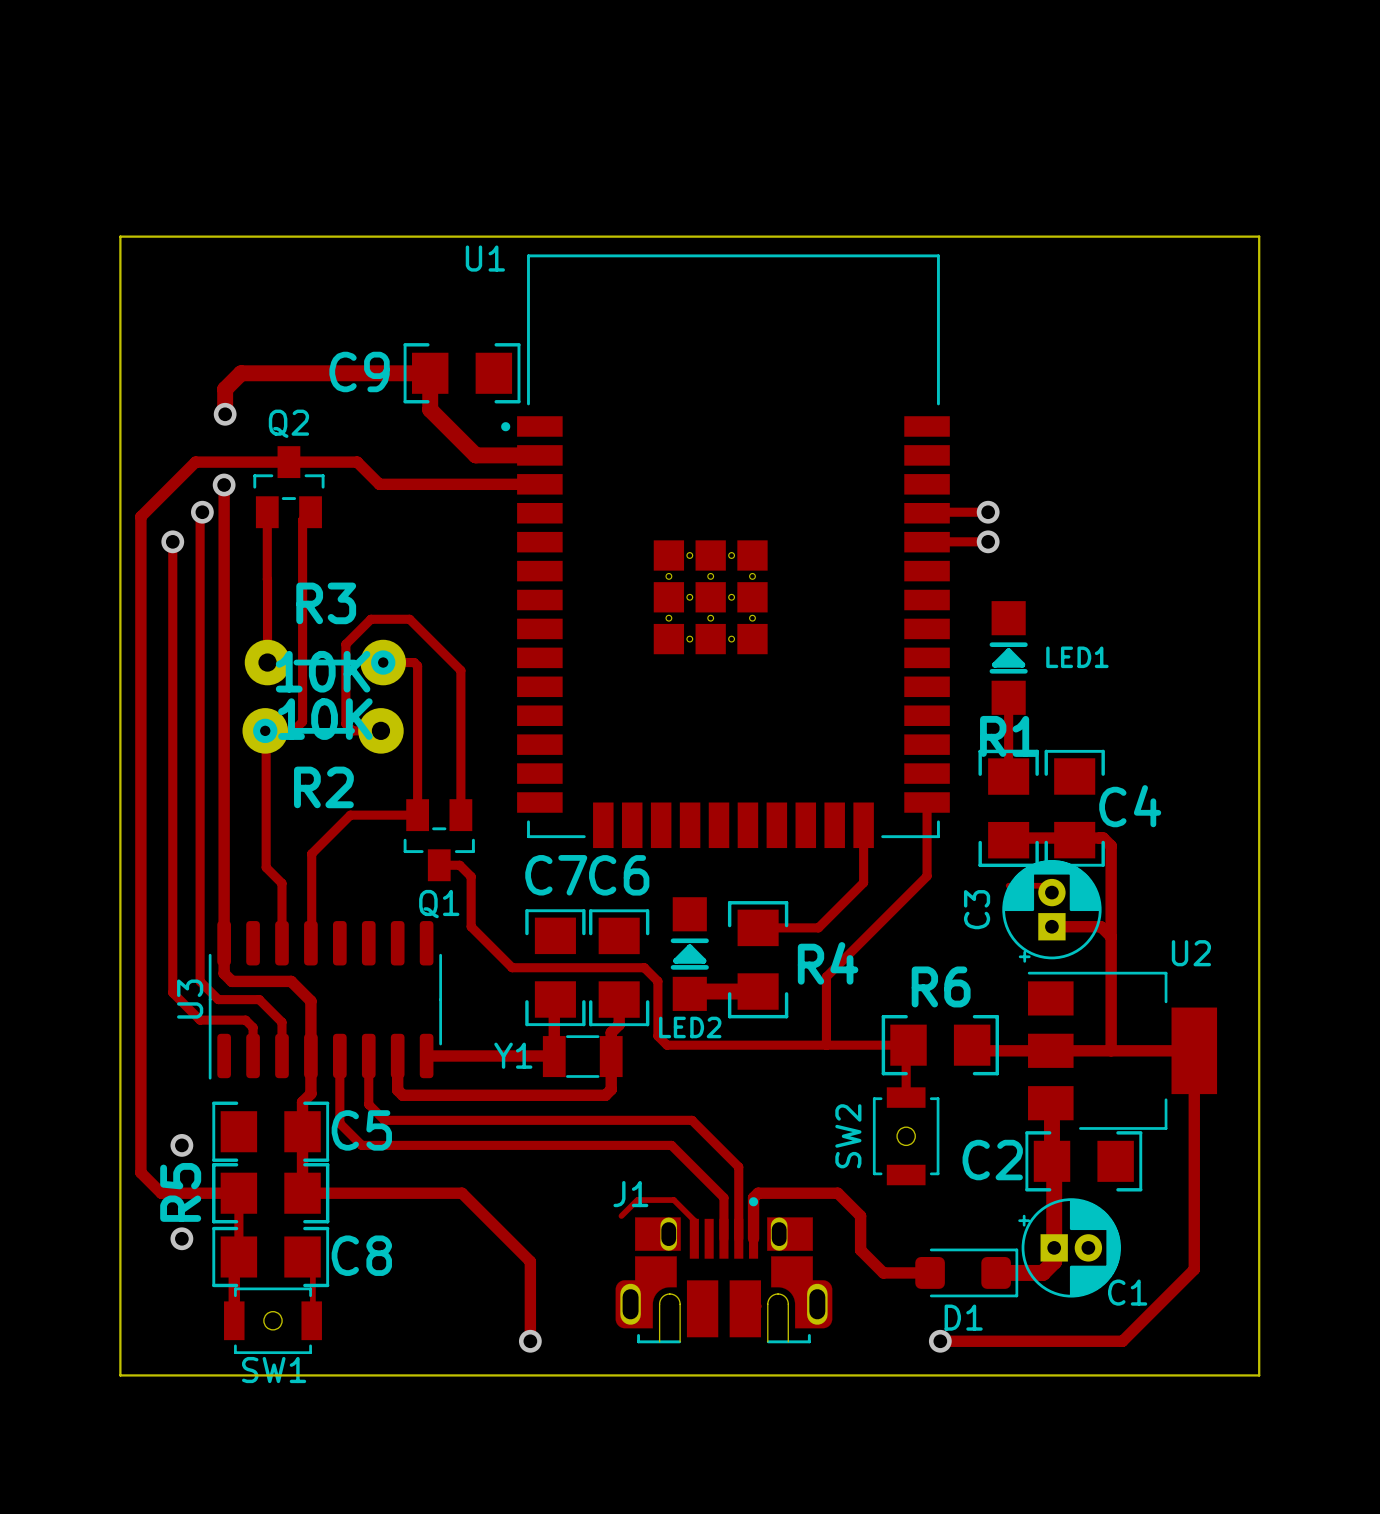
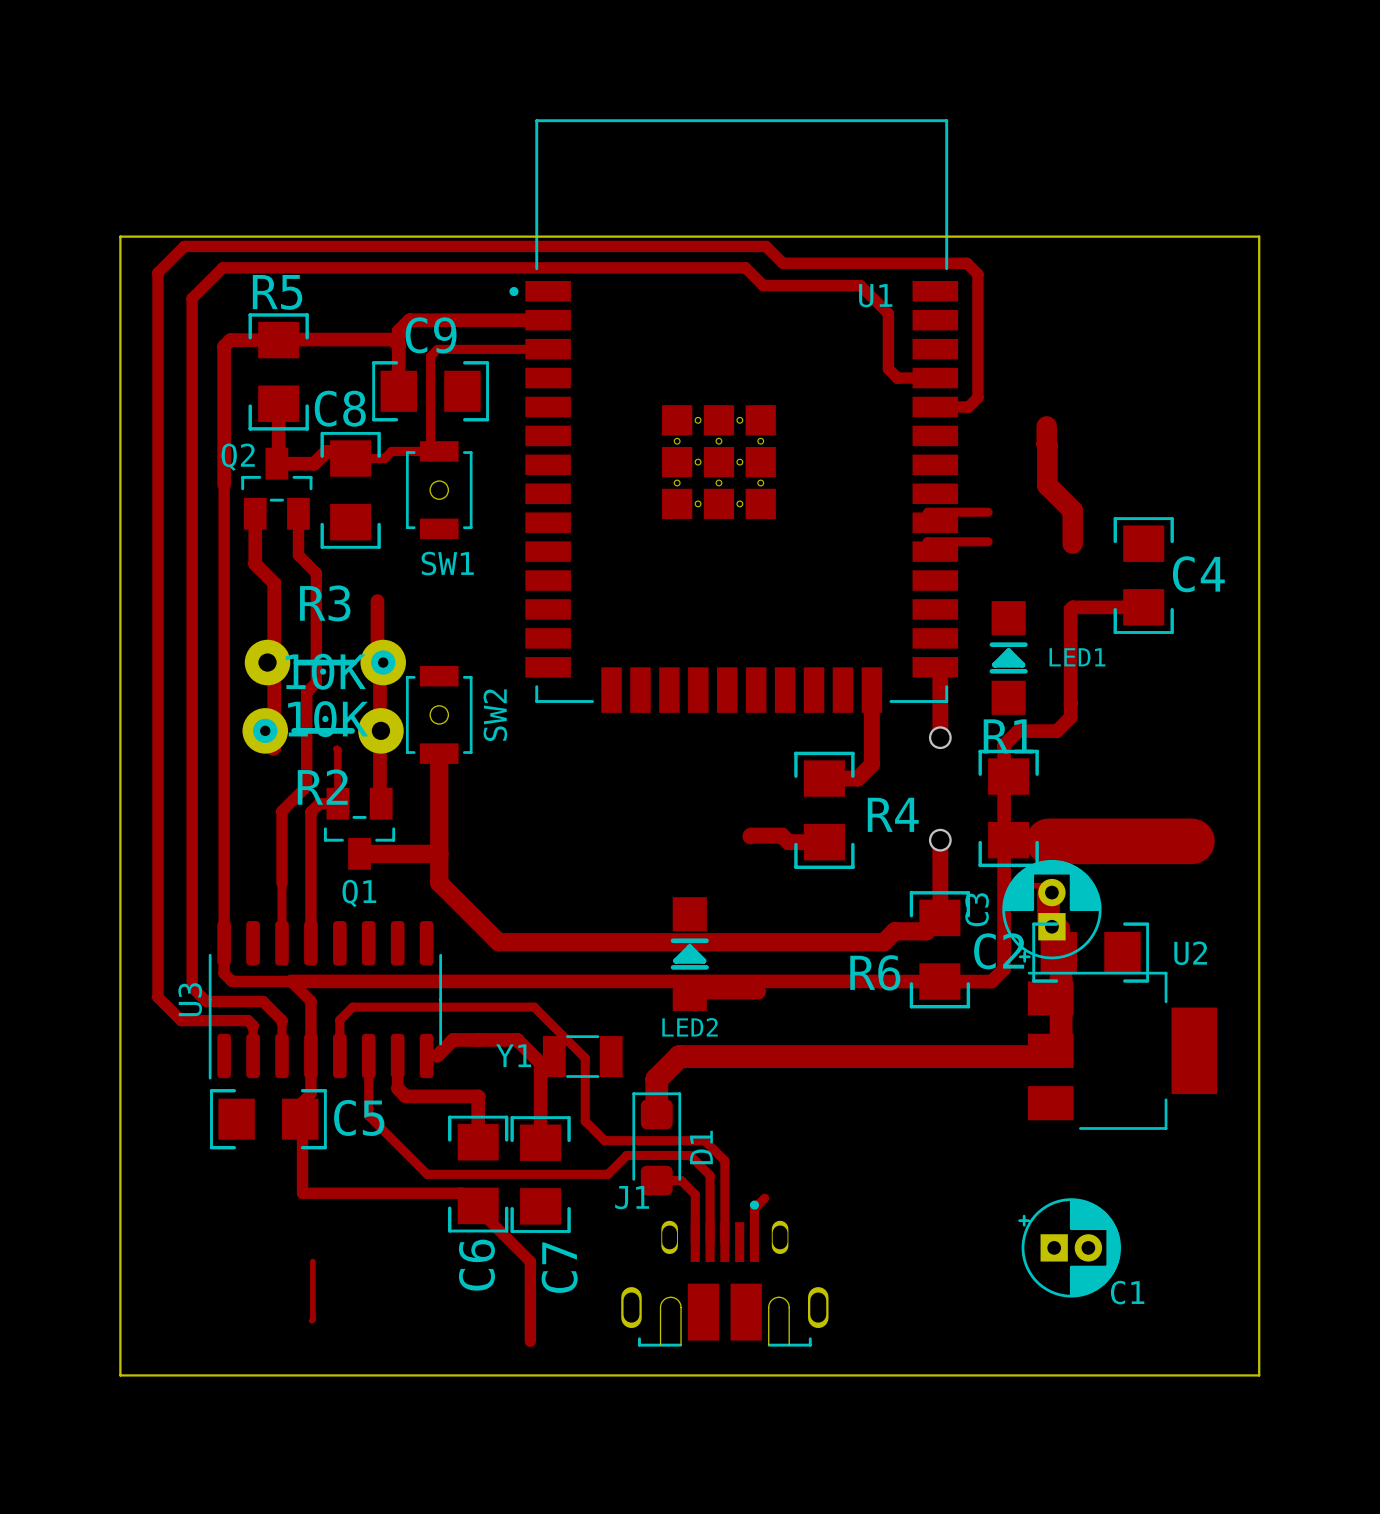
U1 name position: U1 (485, 258) -> U1 (875, 295)
track: none -> (548, 320) (409, 320) (398, 331) (398, 391)
track: none -> (398, 345) (392, 339) (230, 340) (224, 346) (224, 484)
track: none -> (547, 349) (437, 349) (430, 356) (430, 442) (439, 451) (391, 451) (384, 458) (350, 458) (343, 451) (326, 451) (314, 463) (276, 463) (278, 461) (278, 403)
C9 name position: C9 (359, 371) -> C9 (431, 335)
C9 position: (462, 373) -> (430, 391)
track: (225, 414) (225, 389) (241, 373) (430, 373) (430, 409) (475, 455) (539, 455) -> none
via: (225, 414) -> none
Q2 name position: Q2 (288, 423) -> Q2 (238, 457)
track: none -> (1046, 426) (1047, 485) (1072, 510) (1072, 543)
via: (224, 484) -> none
track: (539, 484) (379, 484) (357, 462) (195, 462) (140, 516) (140, 1172) (161, 1193) (238, 1193) (238, 1256) (234, 1261) (234, 1320) -> none
Q2 position: (288, 487) -> (276, 488)
track: (202, 512) (200, 514) (200, 981) (218, 999) (259, 999) (281, 1022) -> (935, 378) (897, 378) (888, 368) (888, 313) (860, 285) (763, 285) (745, 267) (222, 267) (192, 298) (192, 987) (206, 1001) (262, 1001) (281, 1022)
via: (202, 512) -> none
track: (267, 512) (267, 579) -> none
track: (310, 512) (302, 520) (302, 721) (293, 730) (265, 730) -> none
via: (988, 512) -> none
track: none -> (255, 513) (255, 564) (274, 583) (273, 749)
track: (172, 541) (172, 992) (200, 1020) (245, 1020) (253, 1027) -> (935, 406) (968, 406) (977, 397) (977, 274) (966, 263) (782, 263) (766, 246) (184, 246) (157, 272) (157, 997) (181, 1020) (247, 1020) (253, 1027)
via: (172, 541) -> none
via: (988, 541) -> none
U1 position: (725, 551) -> (733, 416)
track: (267, 579) (267, 662) -> none
track: none -> (377, 601) (381, 803)
track: none -> (1143, 607) (1072, 607) (1070, 609) (1070, 717) (1056, 731) (1018, 731) (1004, 745) (1004, 969) (991, 981) (880, 981)
track: (383, 662) (414, 662) (417, 665) (417, 815) (350, 815) (311, 853) (310, 943) -> (336, 749) (337, 803) (319, 803) (310, 812) (310, 943)
track: none -> (935, 667) (940, 672) (940, 737)
track: none -> (871, 690) (871, 764) (857, 778) (824, 778)
track: (1008, 697) (1008, 776) -> none
track: (266, 730) (266, 867) (281, 883) -> (298, 513) (298, 555) (316, 573) (316, 682) (306, 692) (306, 786) (281, 811) (281, 883)
track: (380, 730) (352, 730) (345, 724) (345, 644) (370, 619) (409, 619) (460, 670) (460, 815) -> none
via: none -> (940, 737)
track: none -> (439, 753) (439, 882) (498, 942) (883, 942) (894, 931) (926, 931) (940, 917) (940, 840)
track: (927, 802) (927, 876) (826, 976) (826, 1045) -> none
C4 position: (1074, 808) -> (1143, 575)
track: (863, 825) (863, 882) (818, 927) (758, 927) -> none
track: none -> (750, 836) (782, 835) (788, 842) (824, 842)
Q1 position: (439, 840) -> (359, 828)
via: none -> (940, 840)
track: (1008, 840) (1010, 838) (1103, 838) (1111, 845) (1111, 1050) -> none
track: none -> (1048, 841) (1192, 841)
track: none -> (359, 853) (439, 853)
track: (439, 865) (459, 865) (471, 876) (471, 926) (512, 967) (644, 967) (657, 981) (657, 1036) (667, 1045) (908, 1045) (906, 1047) (906, 1097) -> none
C7 name rotation: 0° (556, 875) -> 90° counterclockwise (559, 1267)
C7 name position: C7 (556, 875) -> C7 (559, 1267)
C6 name rotation: 0° (619, 875) -> 90° counterclockwise (476, 1265)
C6 name position: C6 (619, 875) -> C6 (476, 1265)
track: none -> (1048, 893) (1048, 919) (1058, 929) (1058, 952) (1061, 954) (1061, 1052) (1057, 1056) (679, 1056) (656, 1079) (656, 1114)
track: (1051, 926) (1100, 926) (1111, 936) -> none
R4 position: (758, 959) -> (824, 810)
C7 position: (555, 967) -> (540, 1174)
C6 position: (619, 967) -> (478, 1174)
track: none -> (291, 981) (880, 981)
R6 name position: R6 (941, 986) -> R6 (875, 972)
track: (555, 999) (554, 1056) (437, 1055) -> (540, 1142) (540, 1063) (517, 1039) (453, 1039) (437, 1055)
track: (619, 999) (619, 1024) (611, 1032) (611, 1089) (605, 1095) (402, 1095) (397, 1088) -> (478, 1142) (478, 1096) (405, 1096) (397, 1088)
R6 rotation: 0° (940, 1045) -> 90° clockwise (939, 949)
R6 position: (940, 1045) -> (939, 949)
track: (972, 1045) (977, 1050) (1194, 1050) (1194, 1269) (1122, 1341) (940, 1341) -> none
track: (339, 1055) (339, 1123) (361, 1145) (671, 1145) (723, 1197) (723, 1238) -> (339, 1055) (339, 1020) (352, 1007) (534, 1007) (585, 1058) (585, 1121) (604, 1140) (704, 1140) (724, 1160) (724, 1242)
track: (1050, 1103) (1052, 1161) (1054, 1163) (1054, 1261) (1042, 1272) (996, 1272) -> none
track: (368, 1104) (384, 1120) (692, 1120) (738, 1167) (738, 1238) -> (368, 1104) (368, 1115) (427, 1174) (608, 1174) (626, 1155) (690, 1155) (710, 1175) (710, 1242)
C5 position: (270, 1131) -> (268, 1119)
SW2 name position: SW2 (848, 1136) -> SW2 (495, 715)
SW2 position: (906, 1136) -> (439, 714)
via: (181, 1145) -> none
C2 position: (1083, 1161) -> (1090, 952)
track: none -> (656, 1180) (681, 1180) (695, 1194) (695, 1242)
R5 rotation: 0° (270, 1193) -> 90° clockwise (278, 371)
R5 position: (270, 1193) -> (278, 371)
J1 footprint: [615, 1197, 833, 1344] -> [621, 1200, 829, 1347]
track: none -> (764, 1198) (754, 1208) (754, 1242)
track: (621, 1216) (637, 1200) (673, 1200) (694, 1220) (694, 1238) -> none
via: (181, 1238) -> none
track: (753, 1238) (753, 1197) (758, 1193) (837, 1193) (860, 1216) (860, 1250) (883, 1272) (930, 1272) -> none
C8 name position: C8 (361, 1255) -> C8 (340, 408)
C8 rotation: 0° (270, 1256) -> 90° clockwise (350, 490)
C8 position: (270, 1256) -> (350, 490)
D1 rotation: 0° (966, 1272) -> 90° counterclockwise (656, 1143)
D1 position: (966, 1272) -> (656, 1143)
SW1 rotation: 0° (272, 1320) -> 90° clockwise (439, 490)
SW1 position: (272, 1320) -> (439, 490)
via: (530, 1341) -> none
via: (940, 1341) -> none

